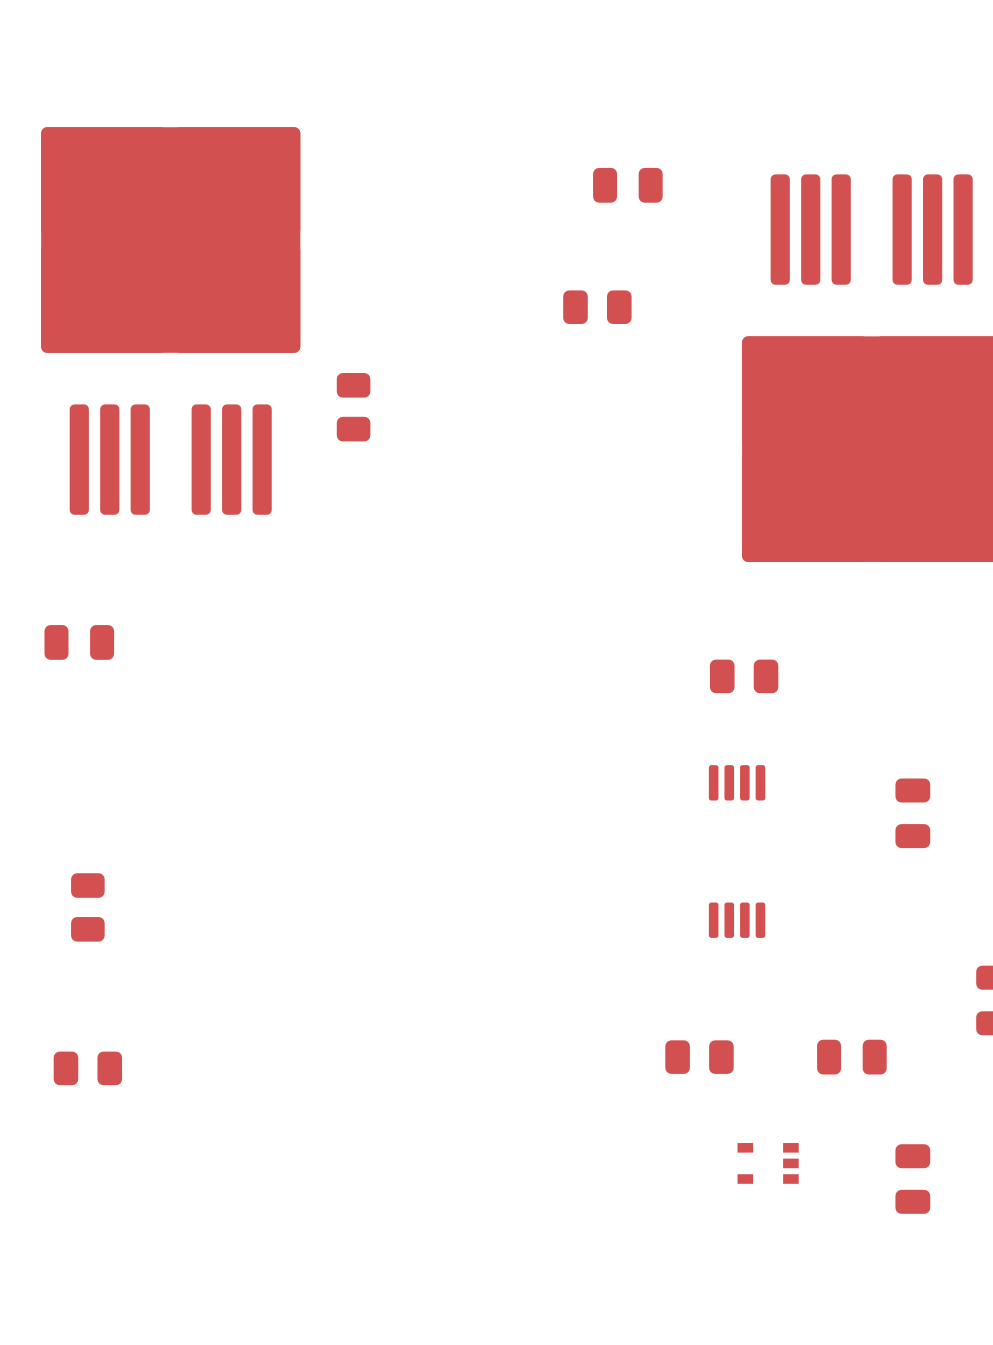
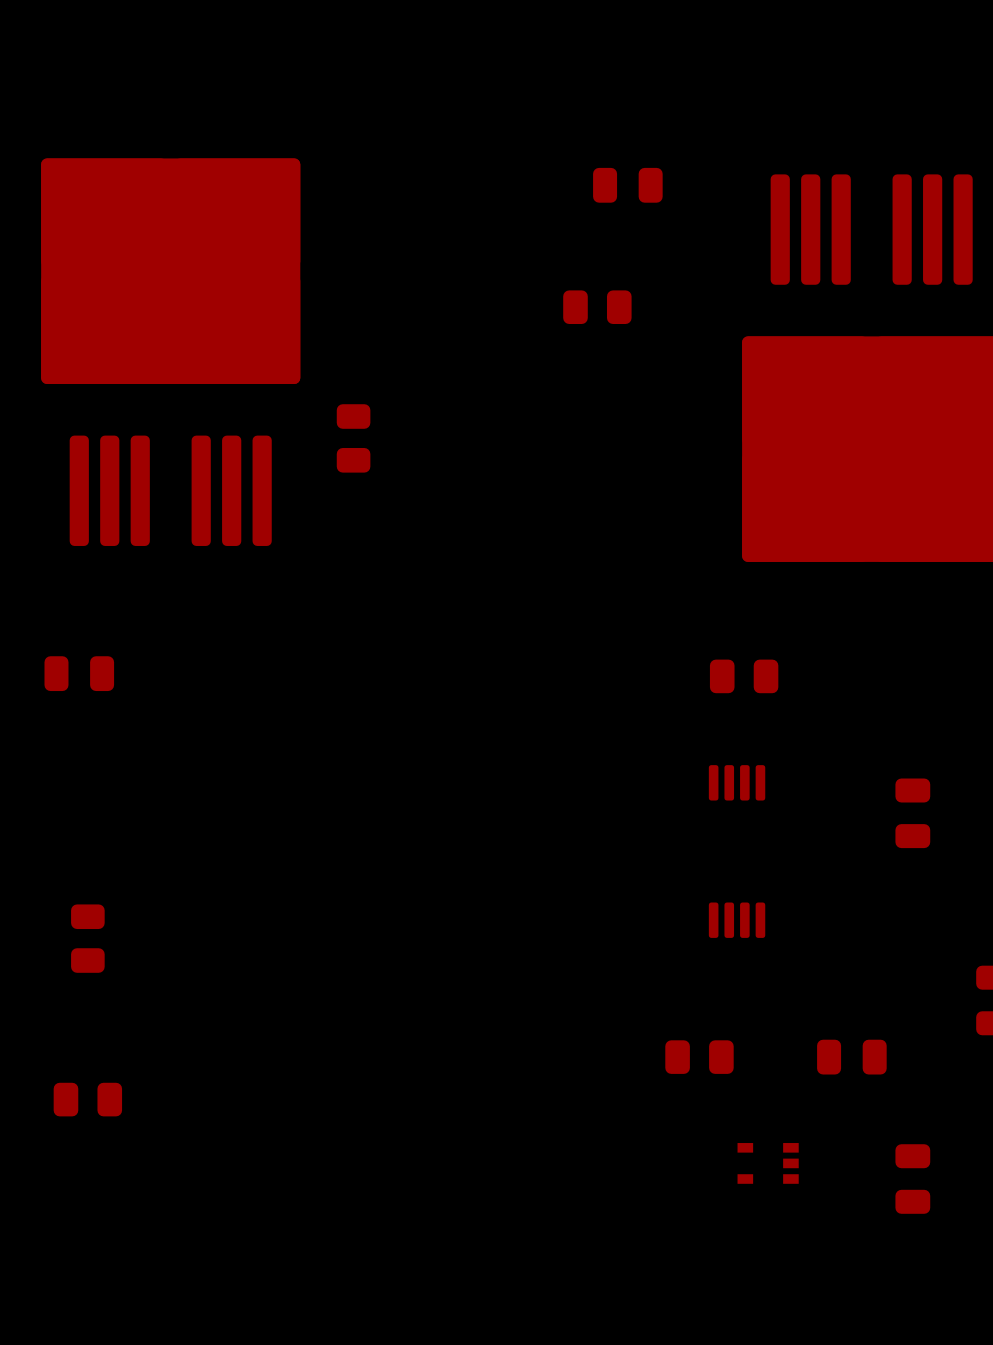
part position: (170, 321) -> (170, 352)
part position: (353, 407) -> (353, 438)
part position: (79, 642) -> (79, 673)
part position: (87, 907) -> (87, 938)
part position: (87, 1068) -> (87, 1099)

